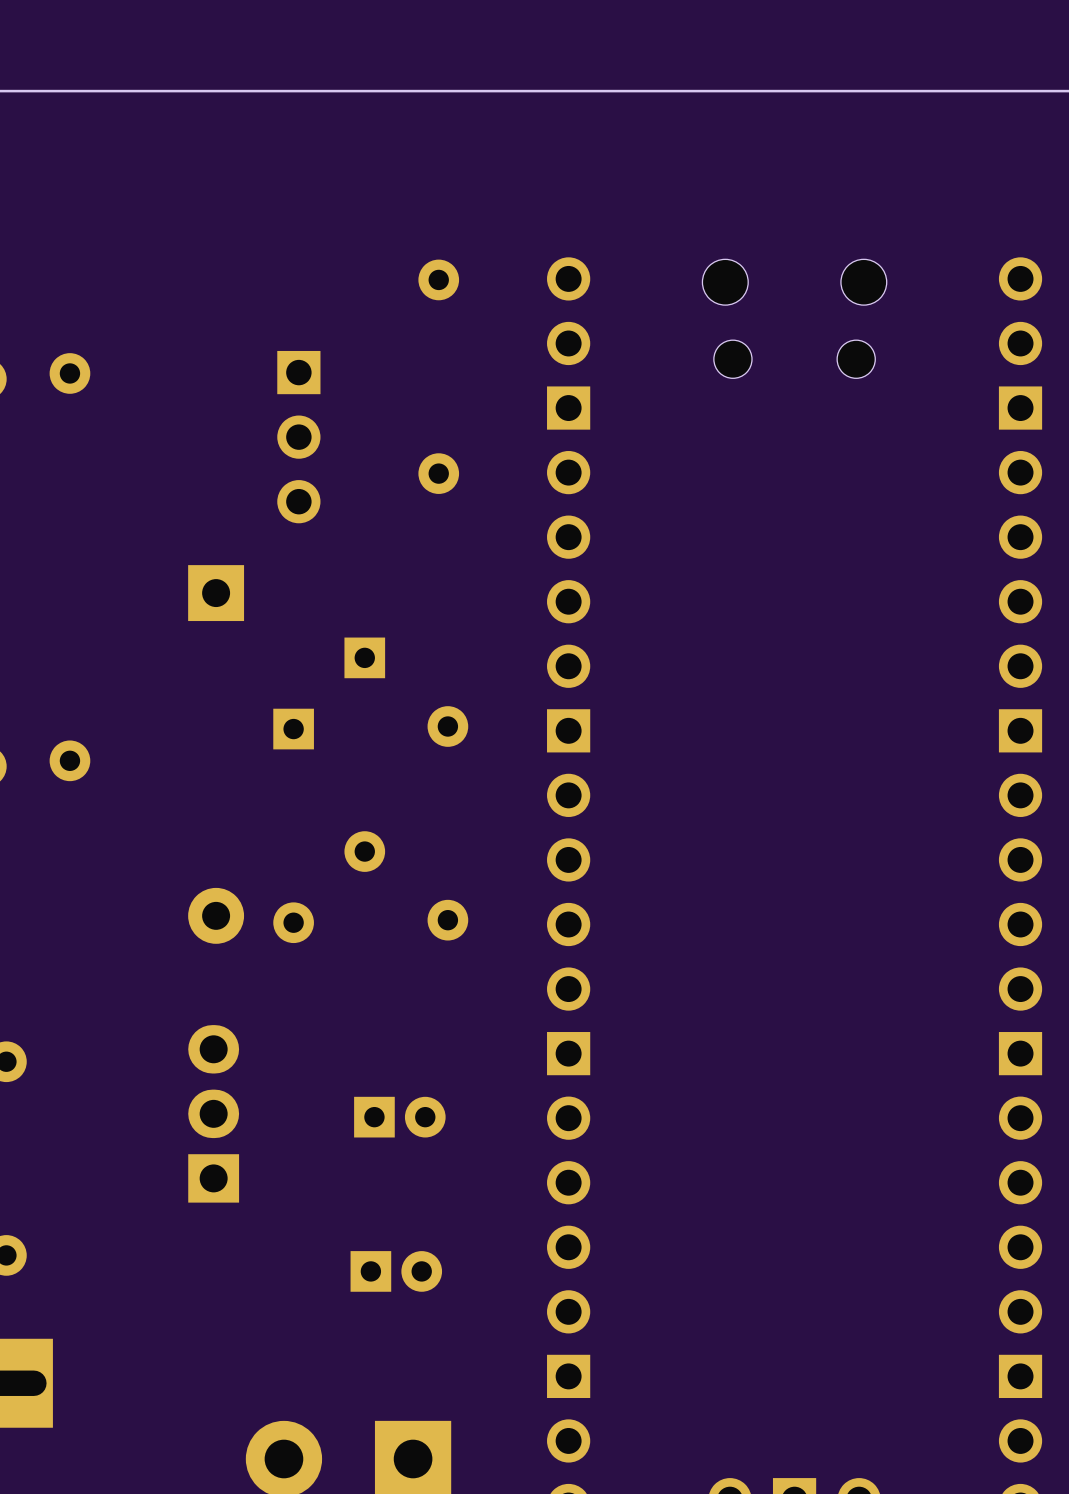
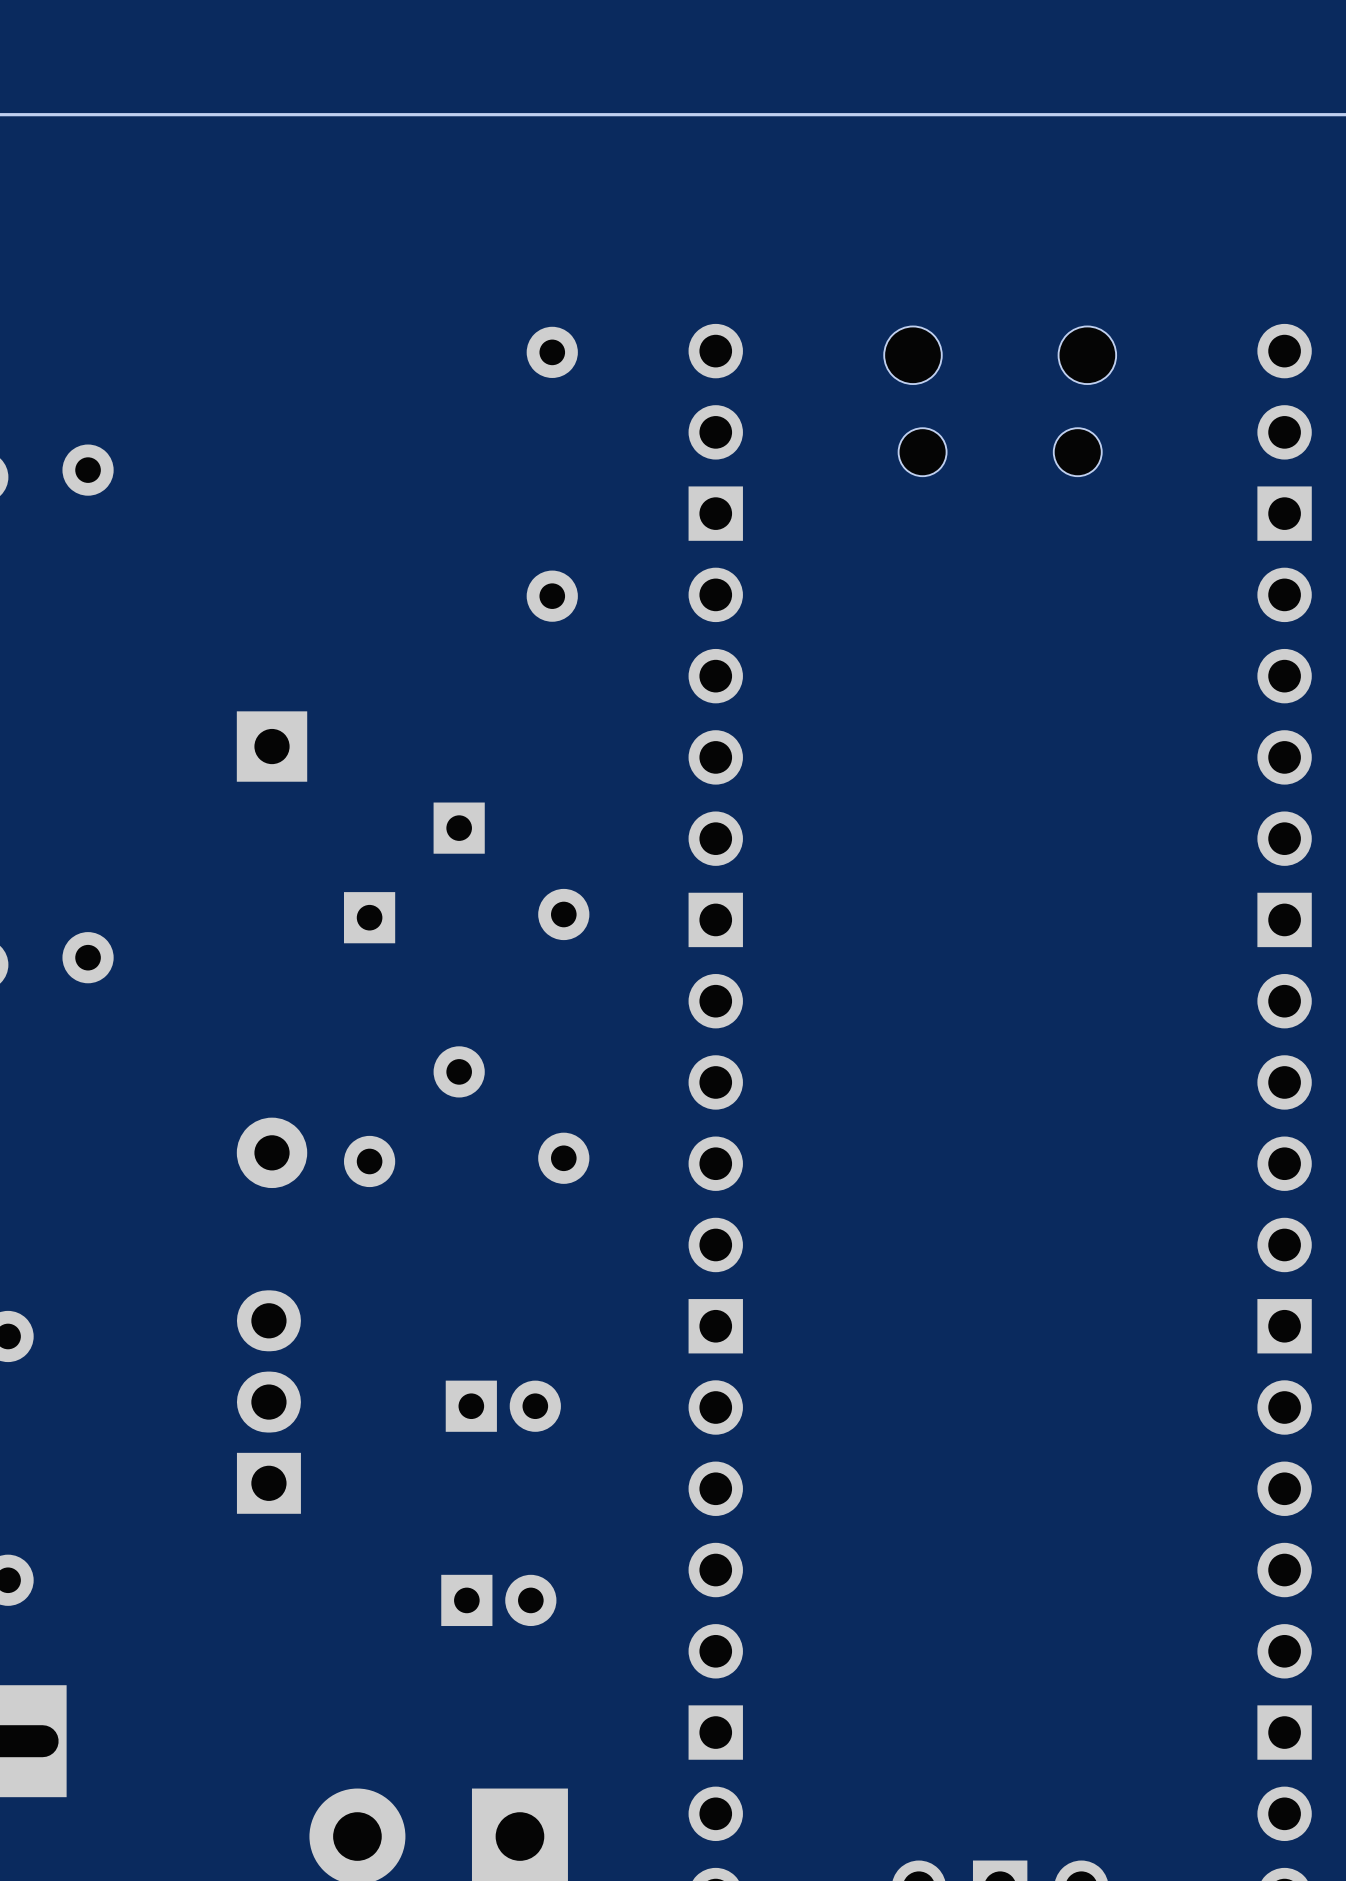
part: (298, 437) -> none

